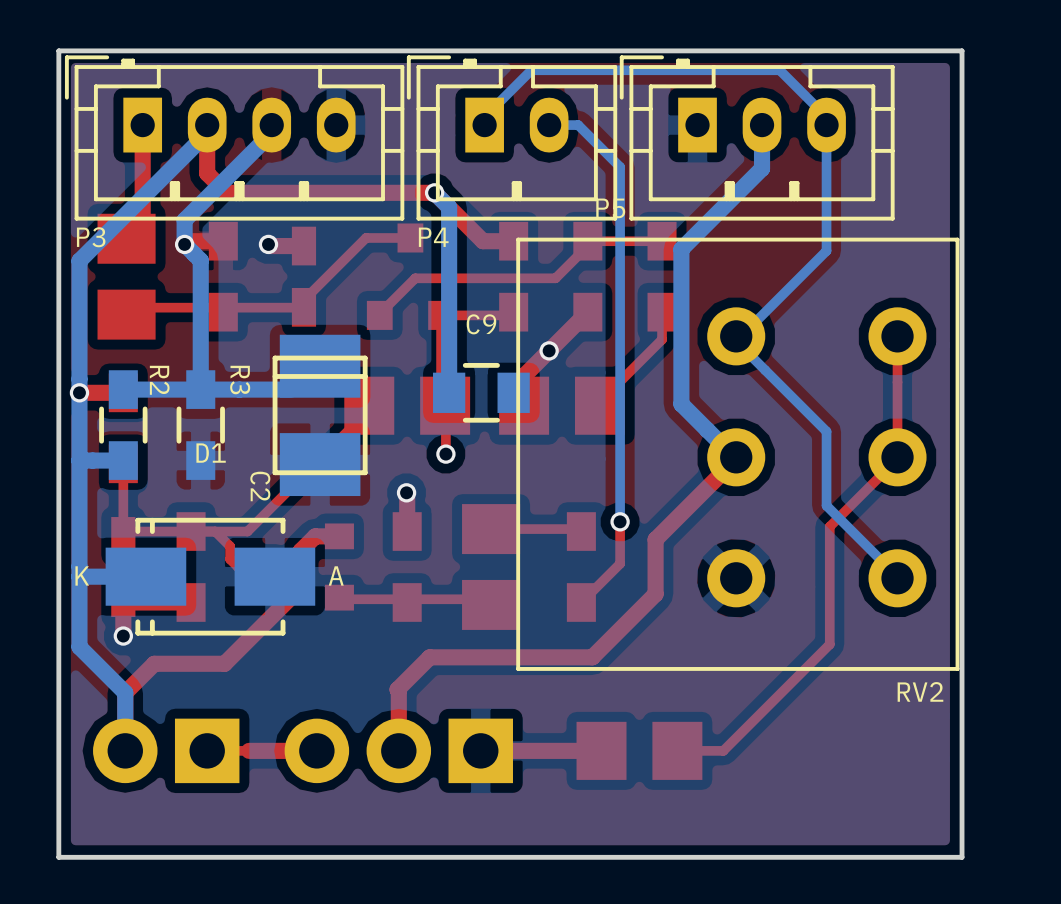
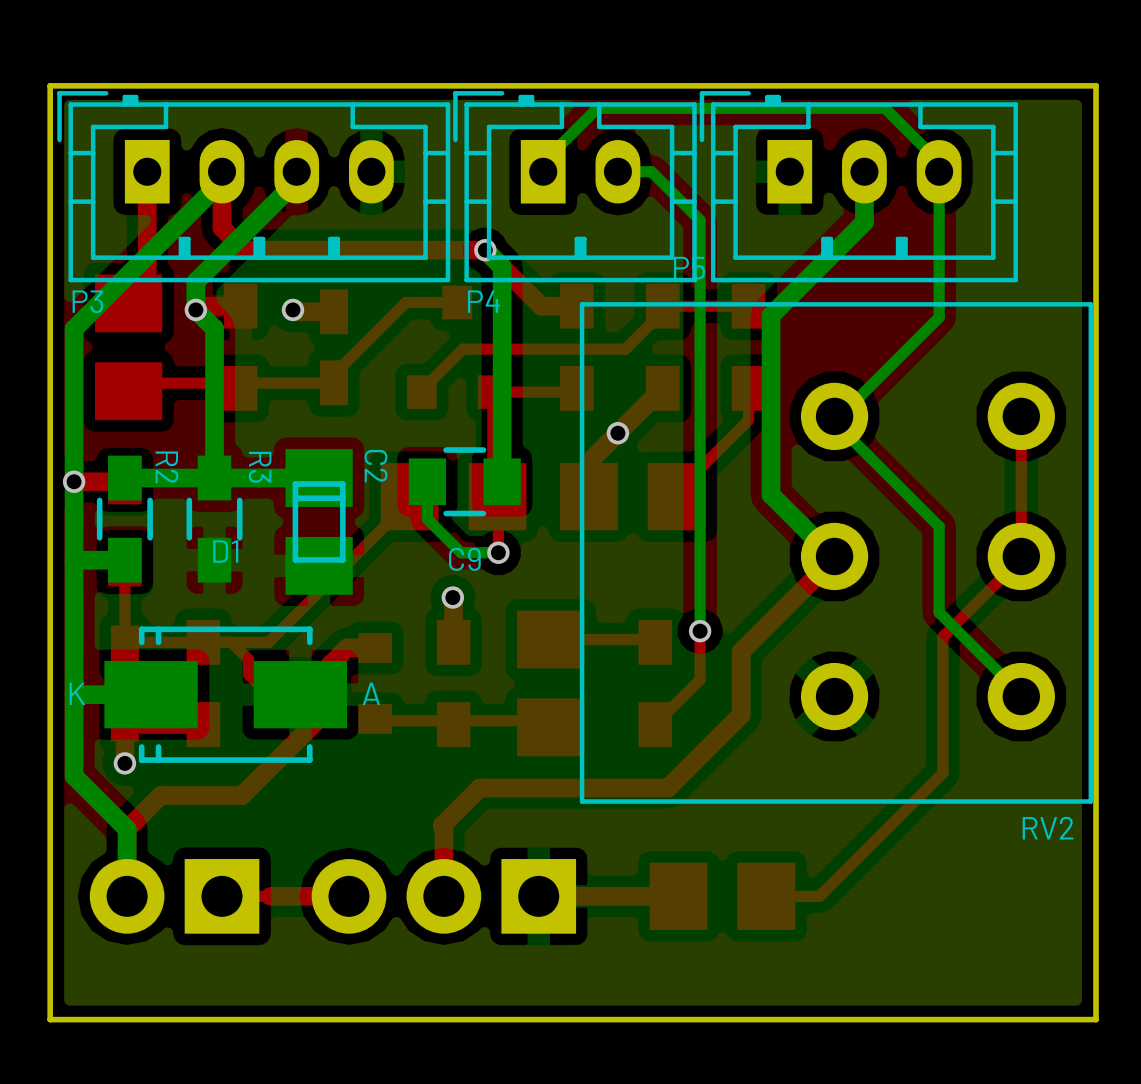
C9 name position: C9 (481, 324) -> C9 (464, 559)
C2 footprint: [272, 334, 368, 497] -> [285, 449, 353, 595]
bottom track: none -> (427, 481) (427, 519) (461, 552) (498, 552)
C9 position: (481, 392) -> (464, 481)
C2 name position: C2 (260, 486) -> C2 (375, 466)

